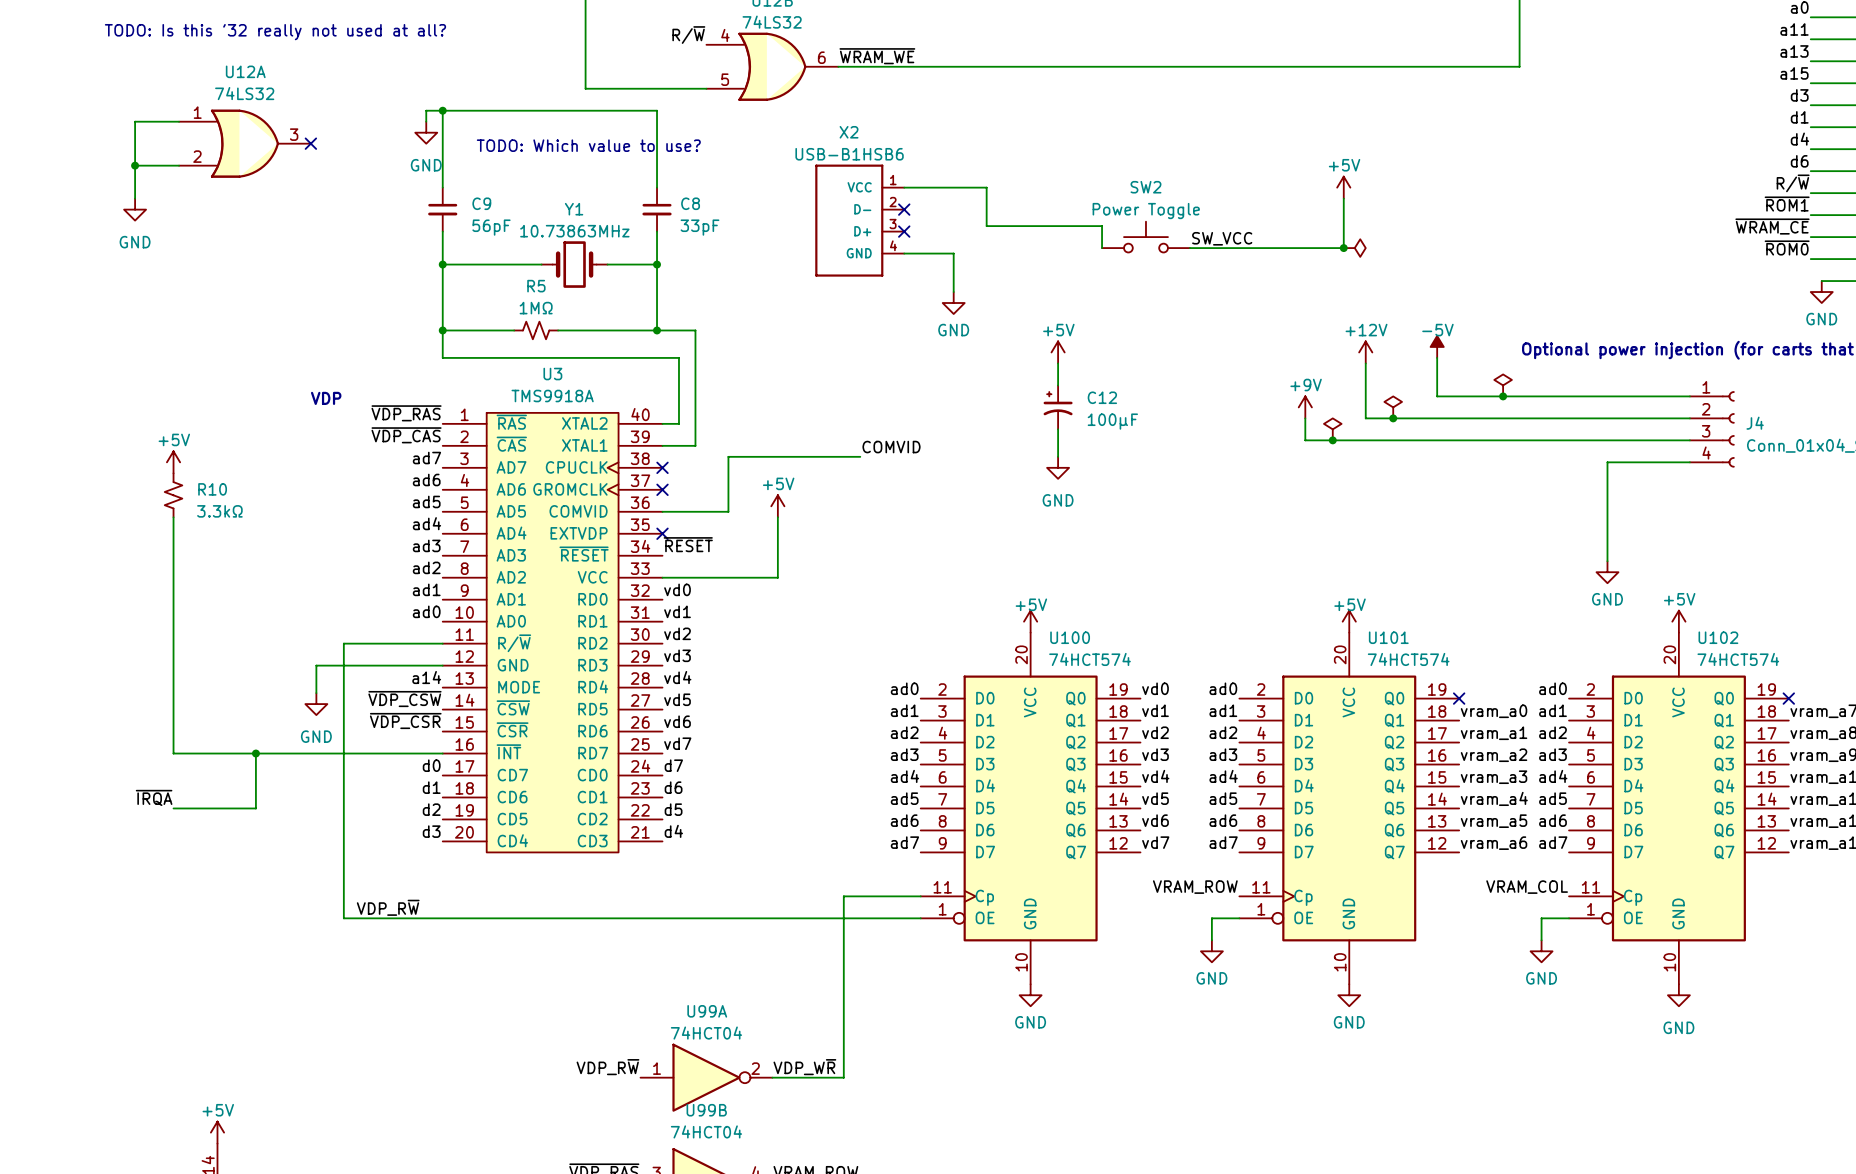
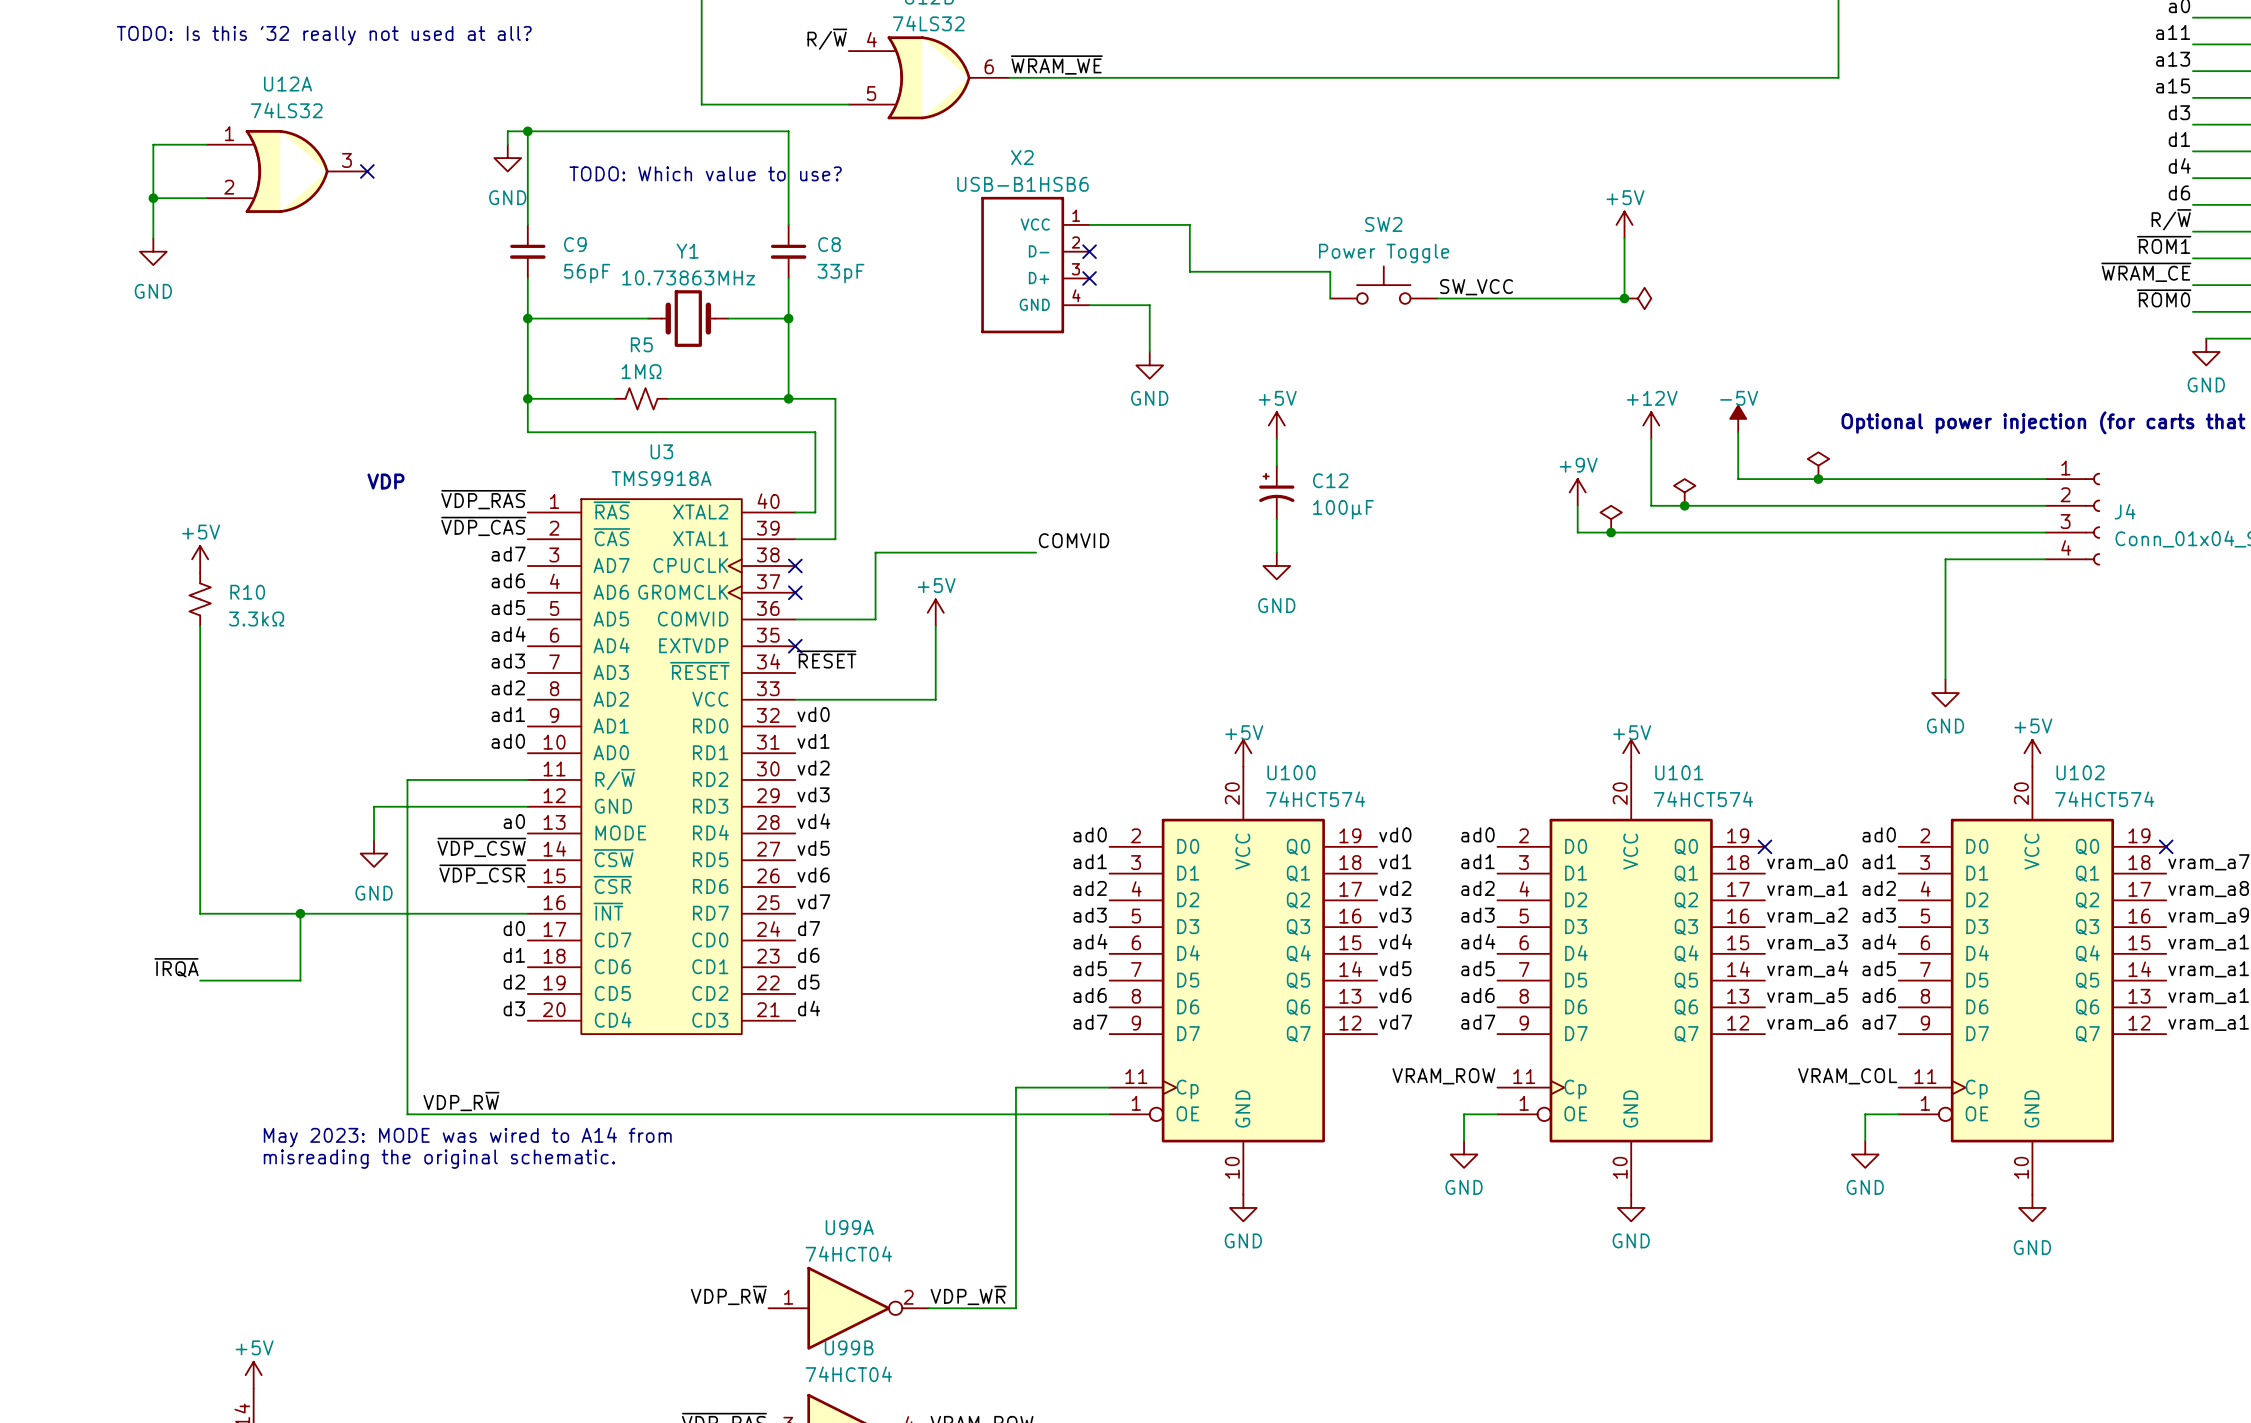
label: a14 (426, 677) -> a0 (514, 821)
text: none -> May 2023: MODE was wired to A14 from (467, 1137)
text: none -> misreading the original schematic. (439, 1159)

